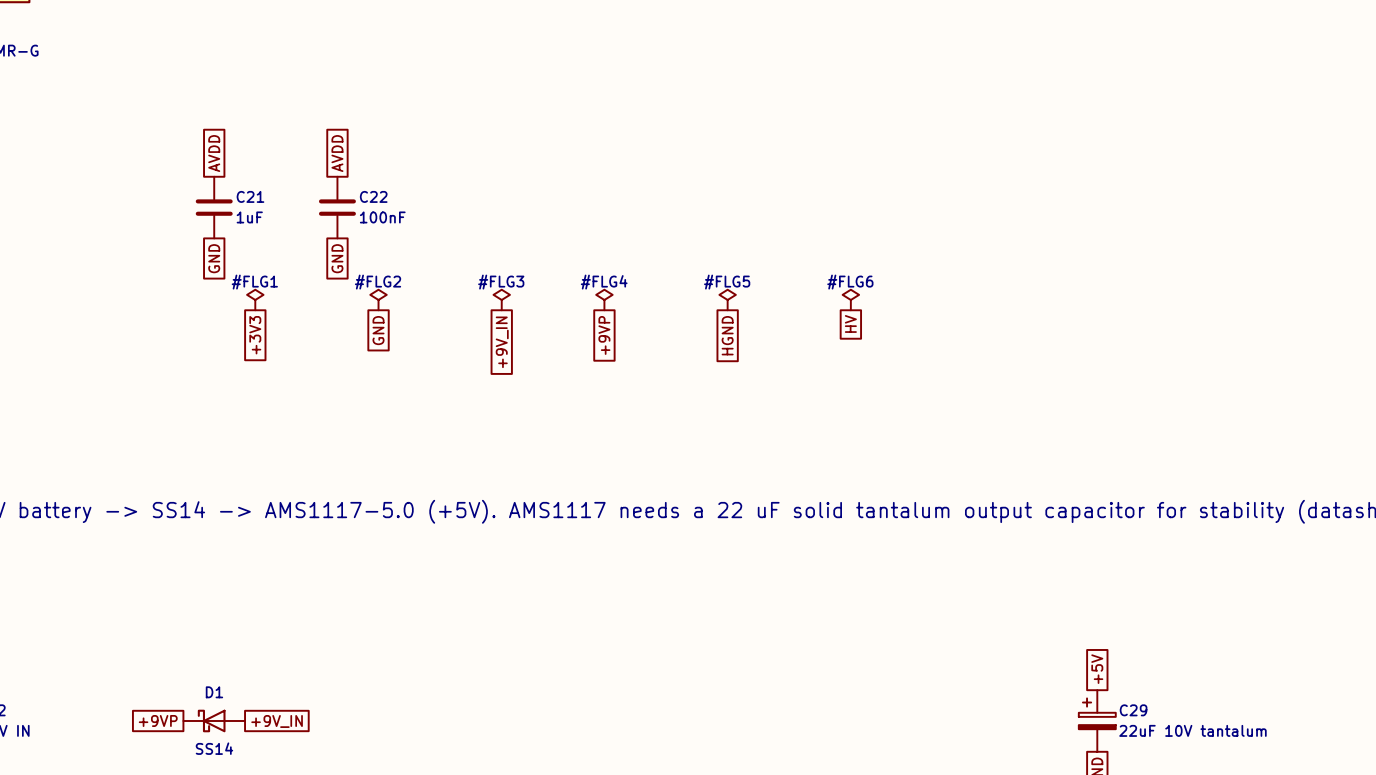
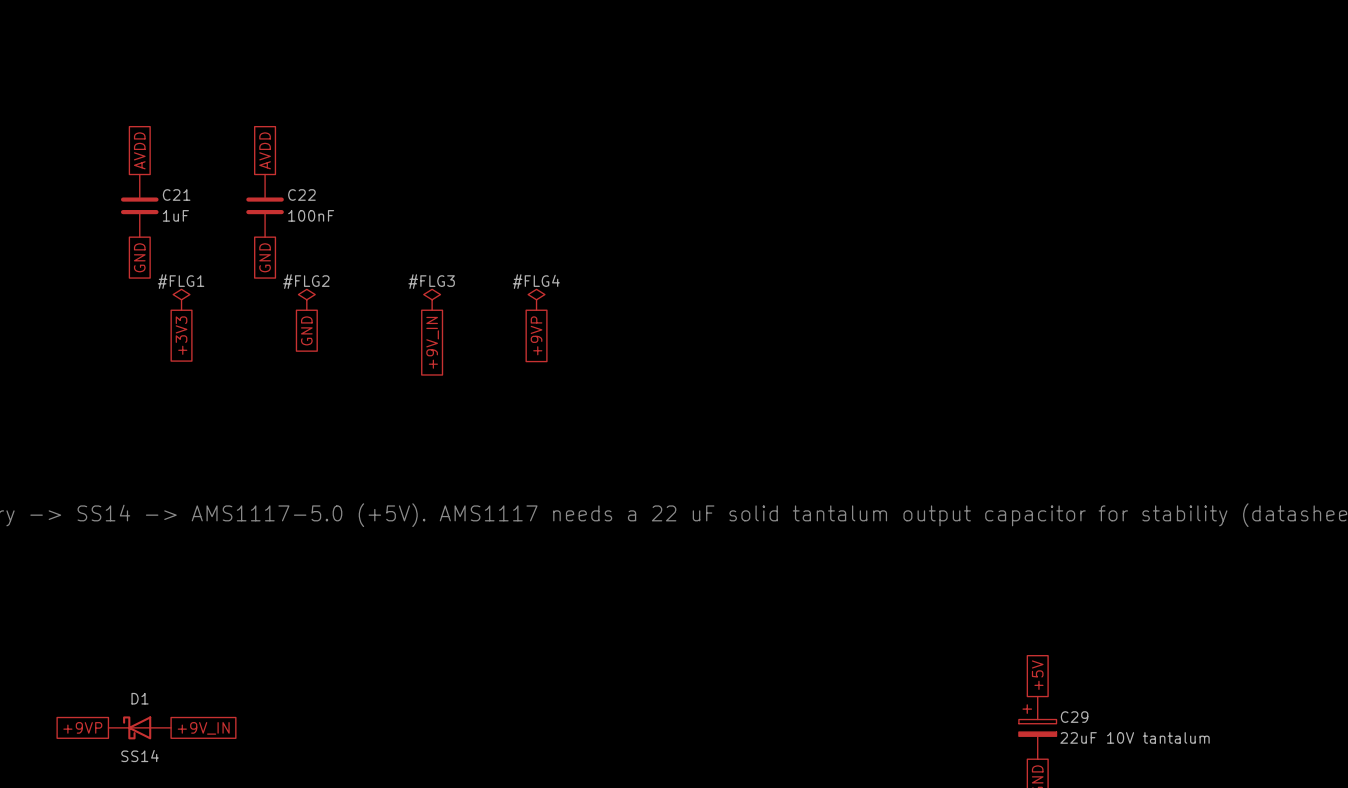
#FLG5: (727, 299) -> none
#FLG6: (850, 299) -> none
global label: HV (850, 323) -> none
global label: HGND (727, 335) -> none

